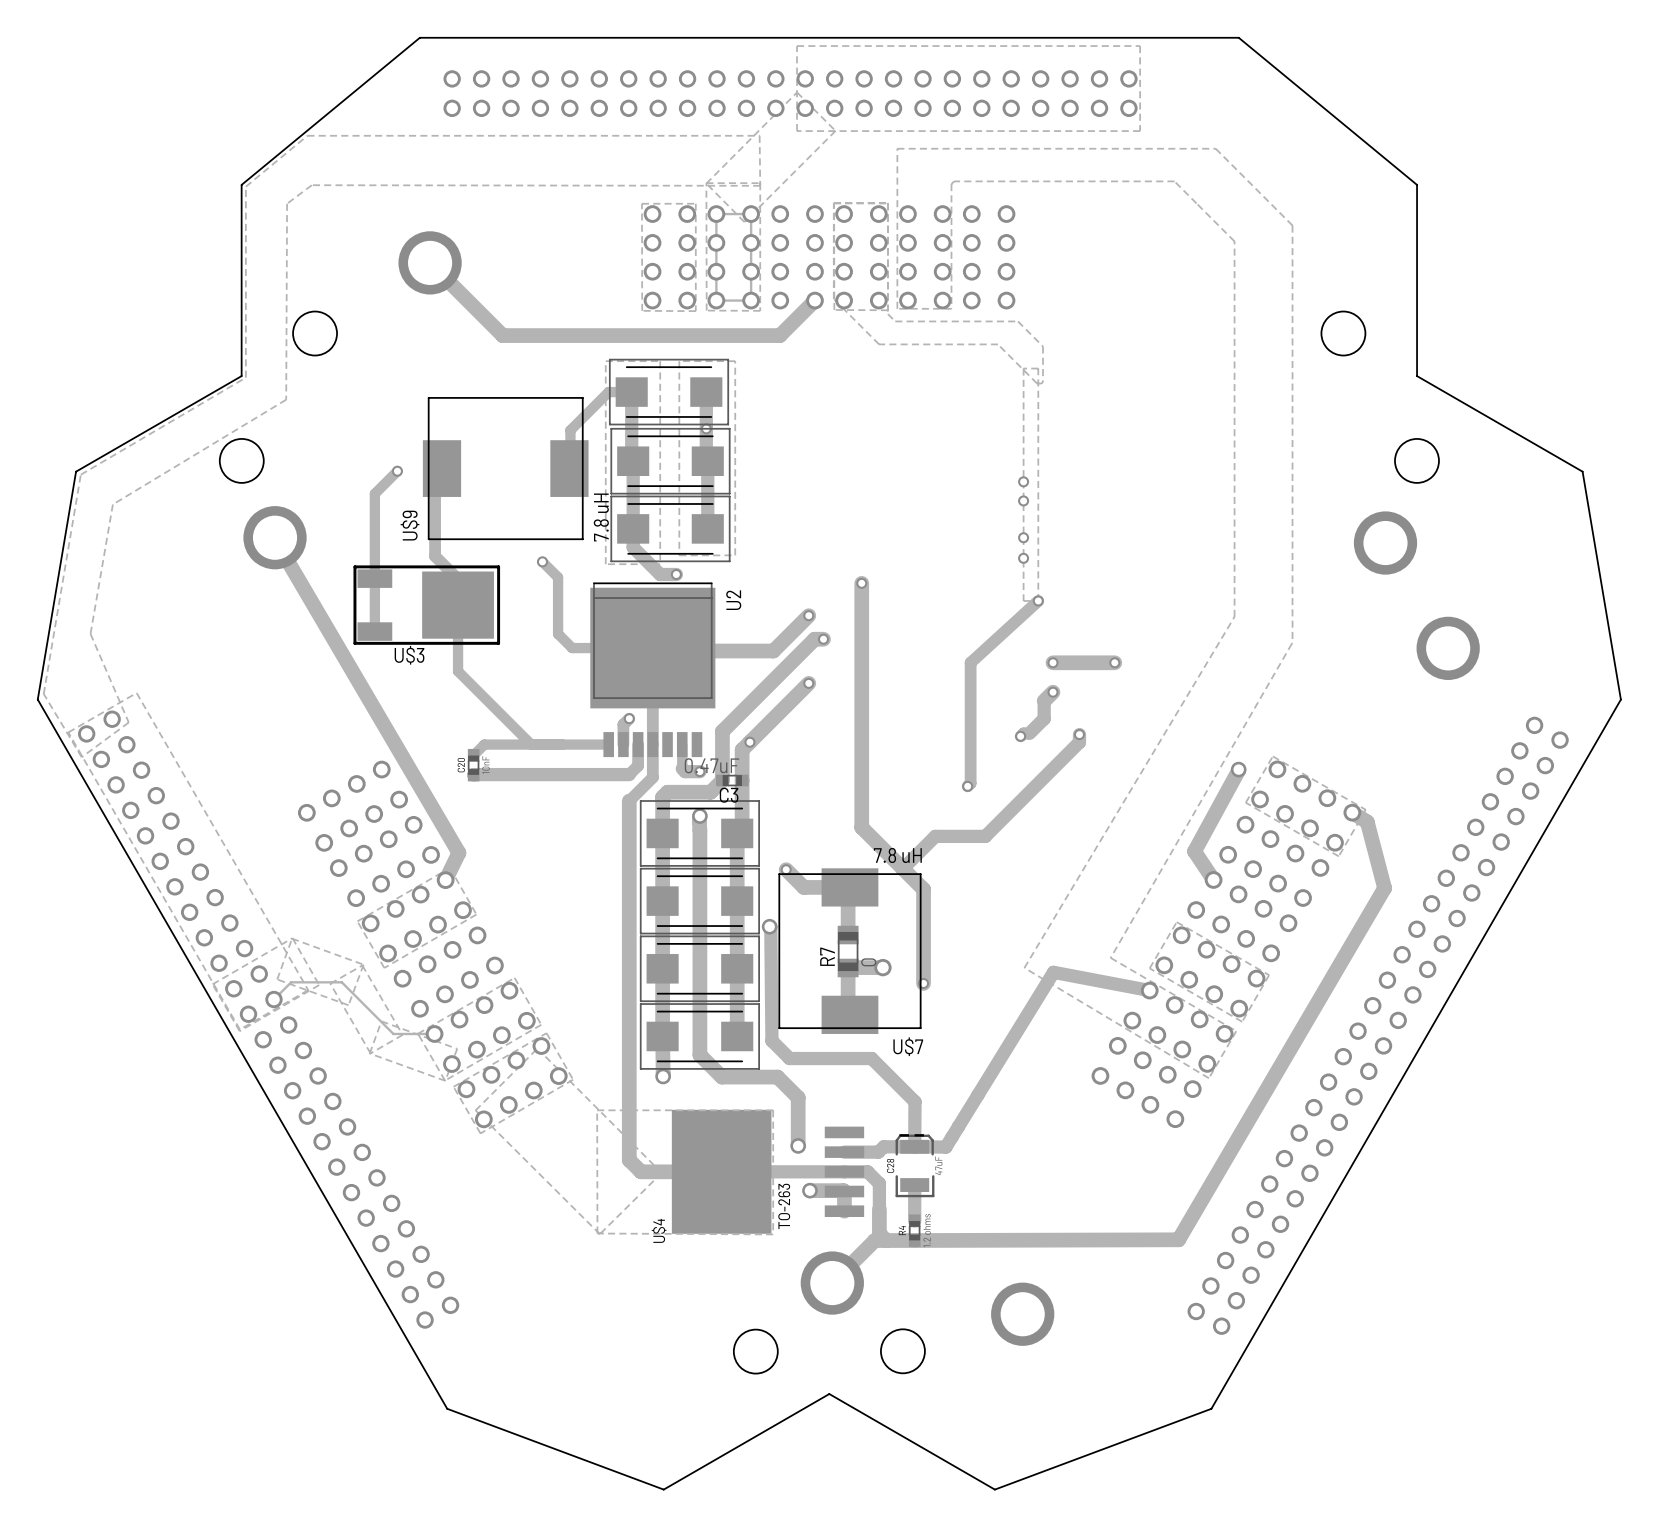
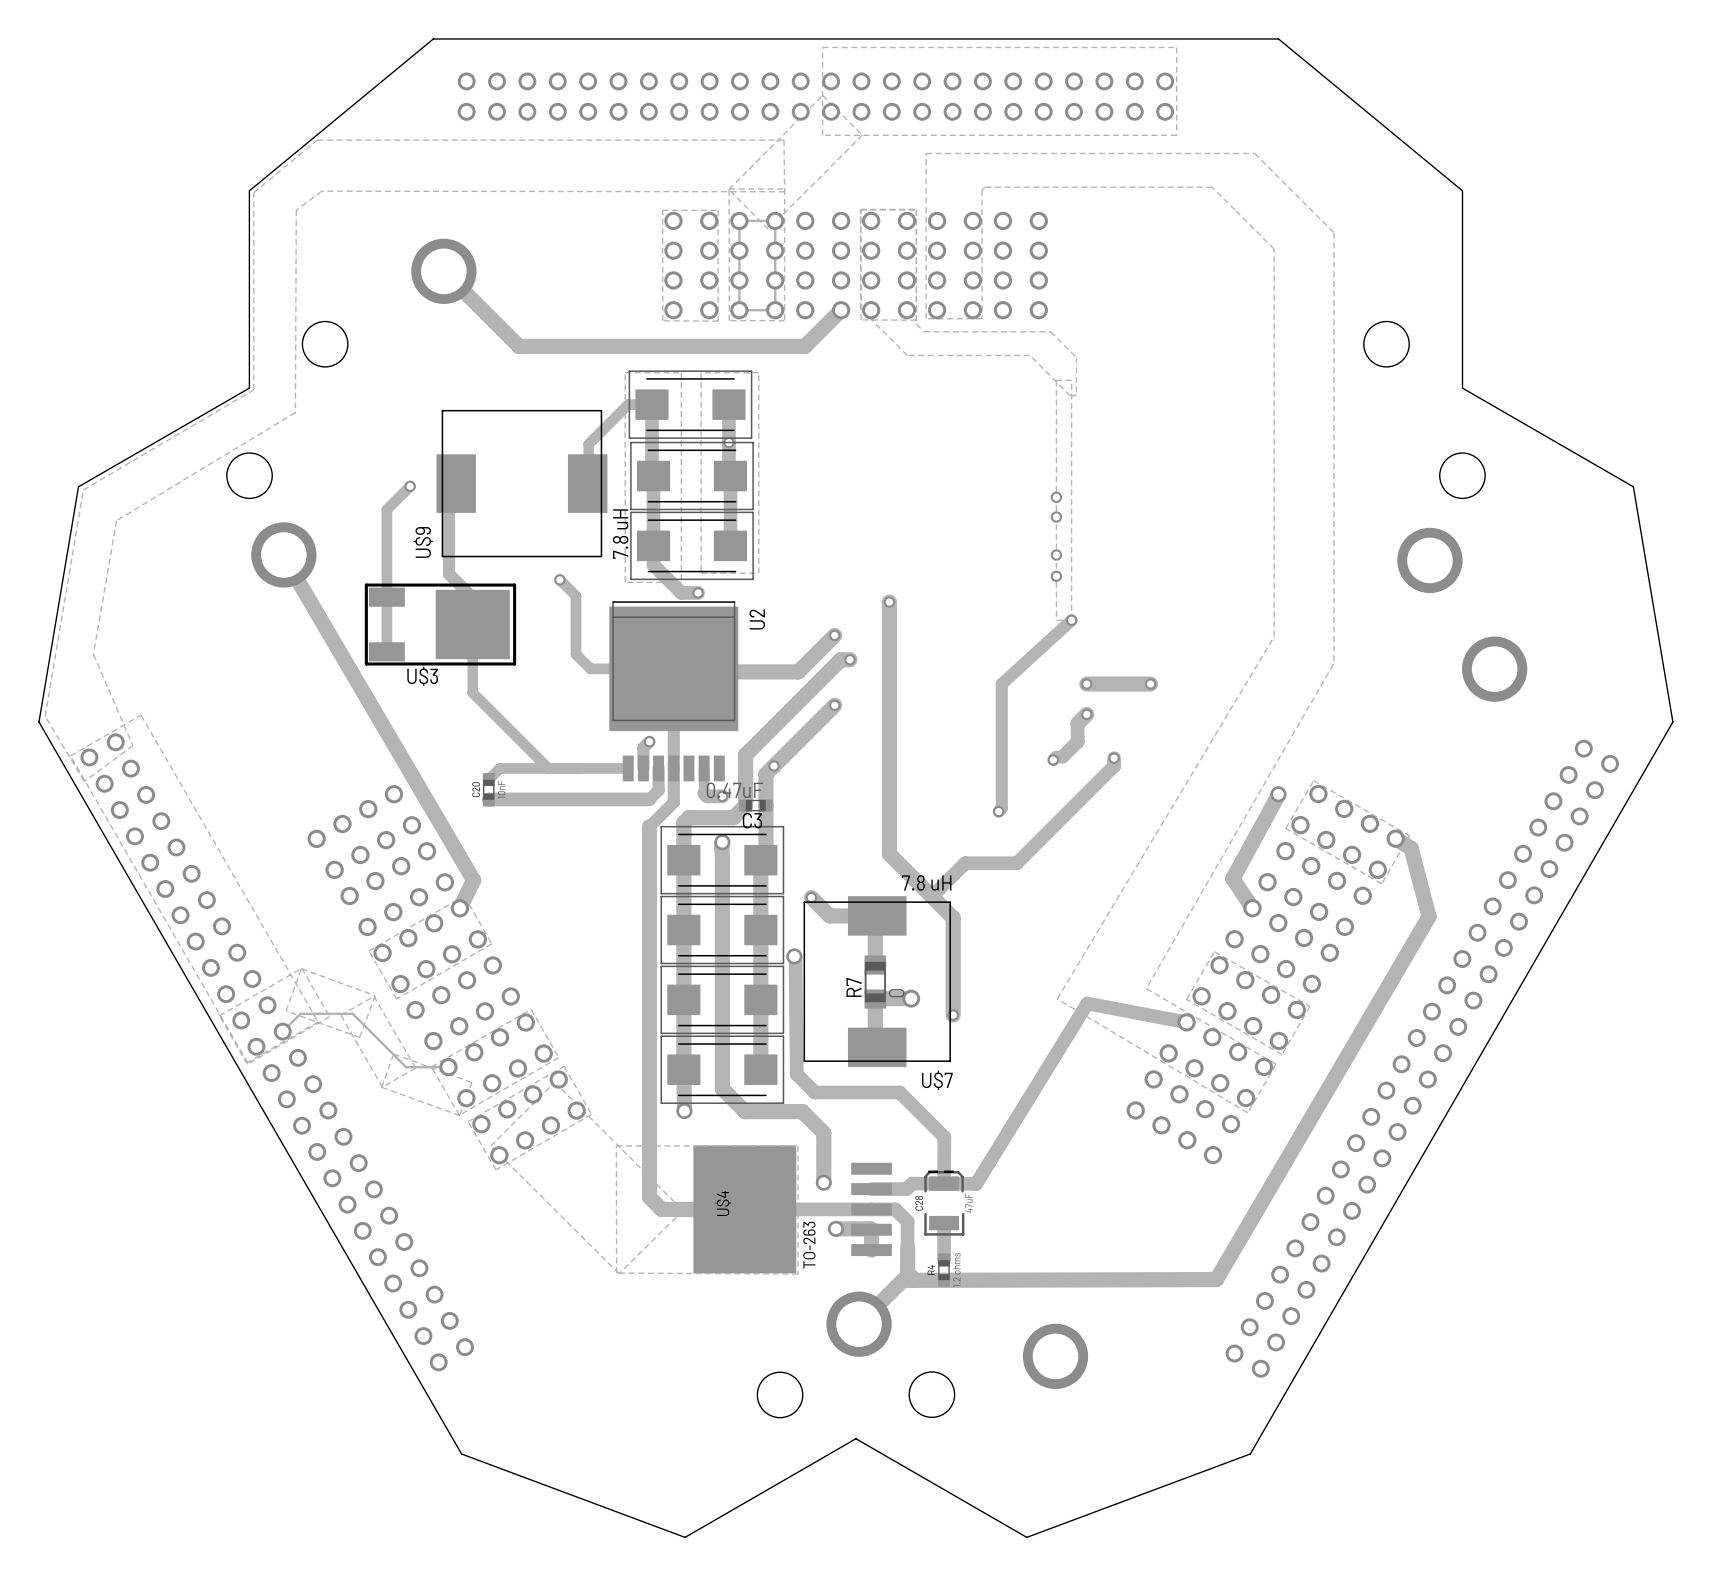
U$4 name position: U$4 (659, 1230) -> U$4 (723, 1203)

